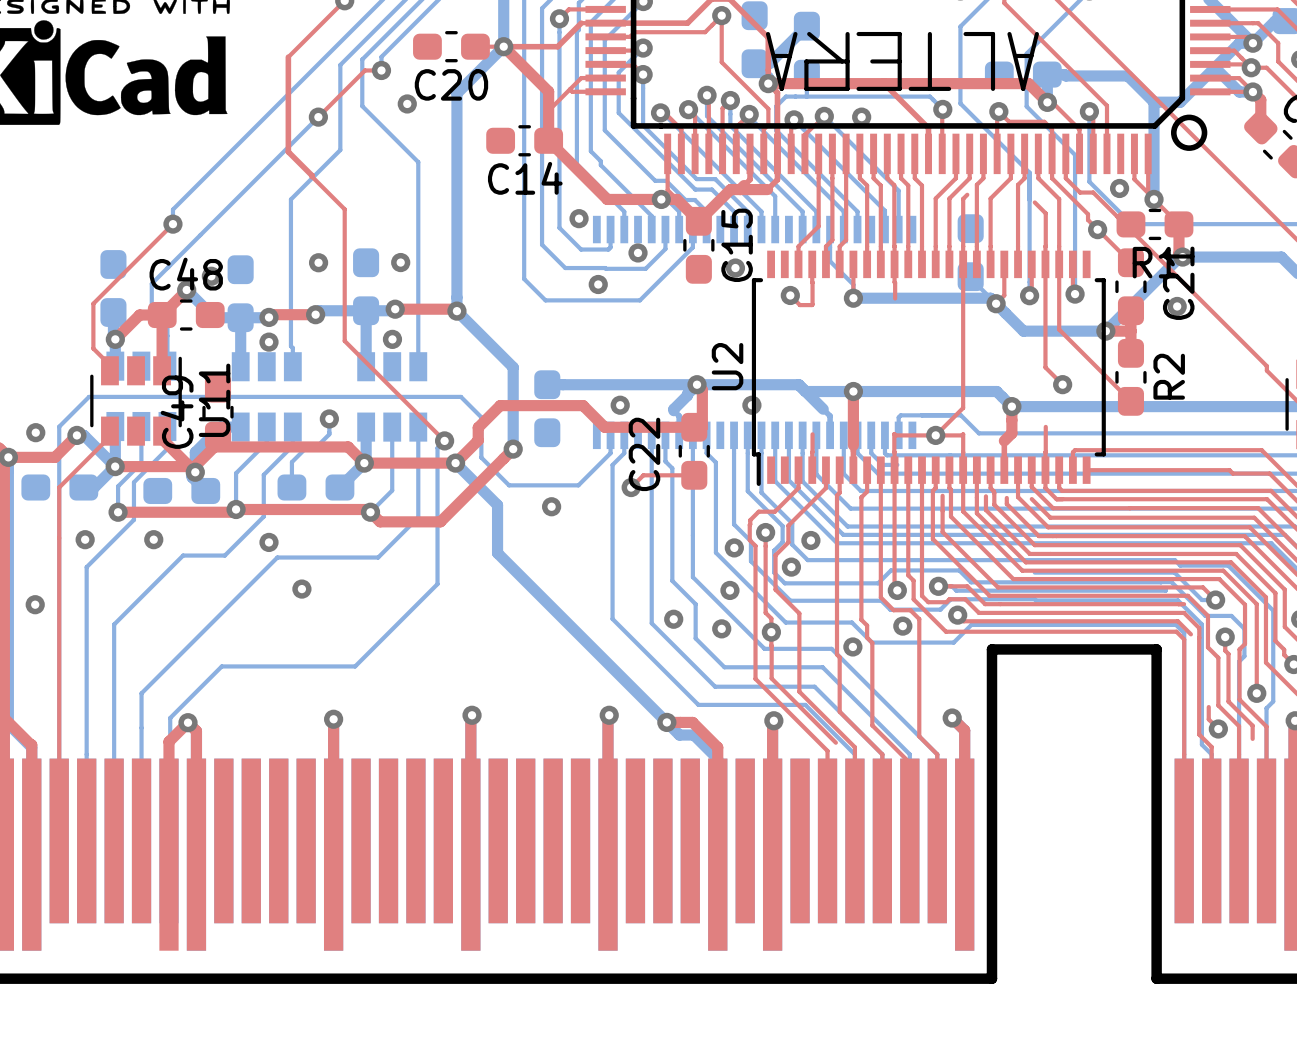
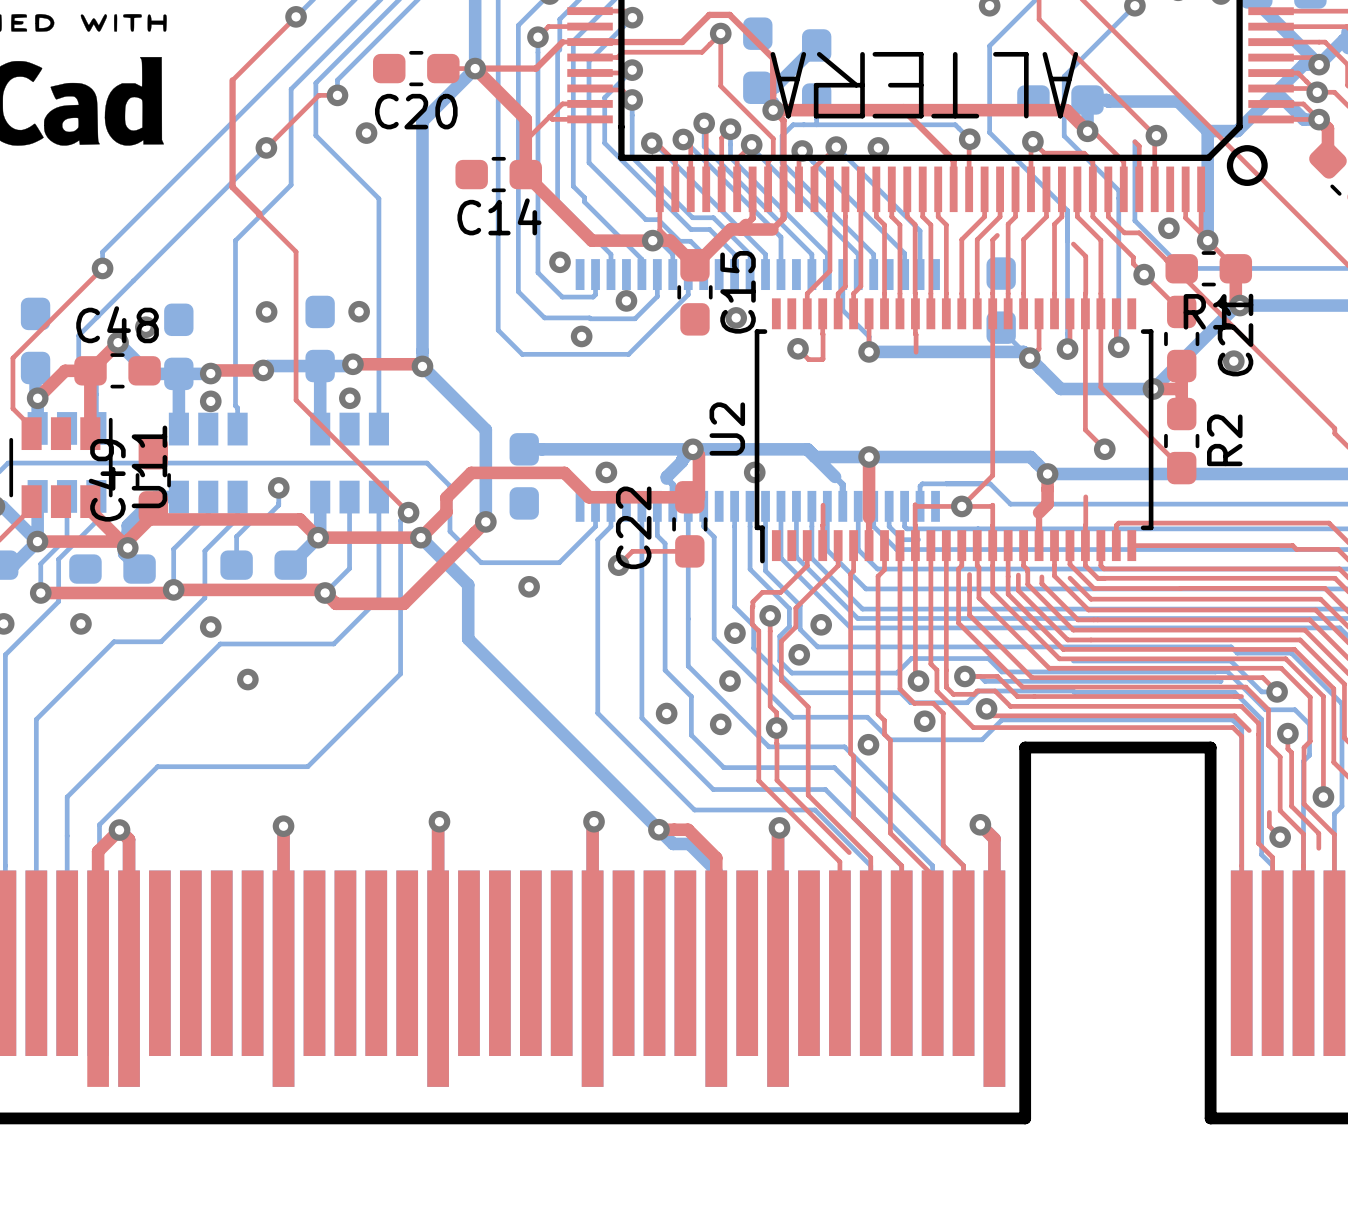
via position: (1089, 111) -> (1156, 135)

